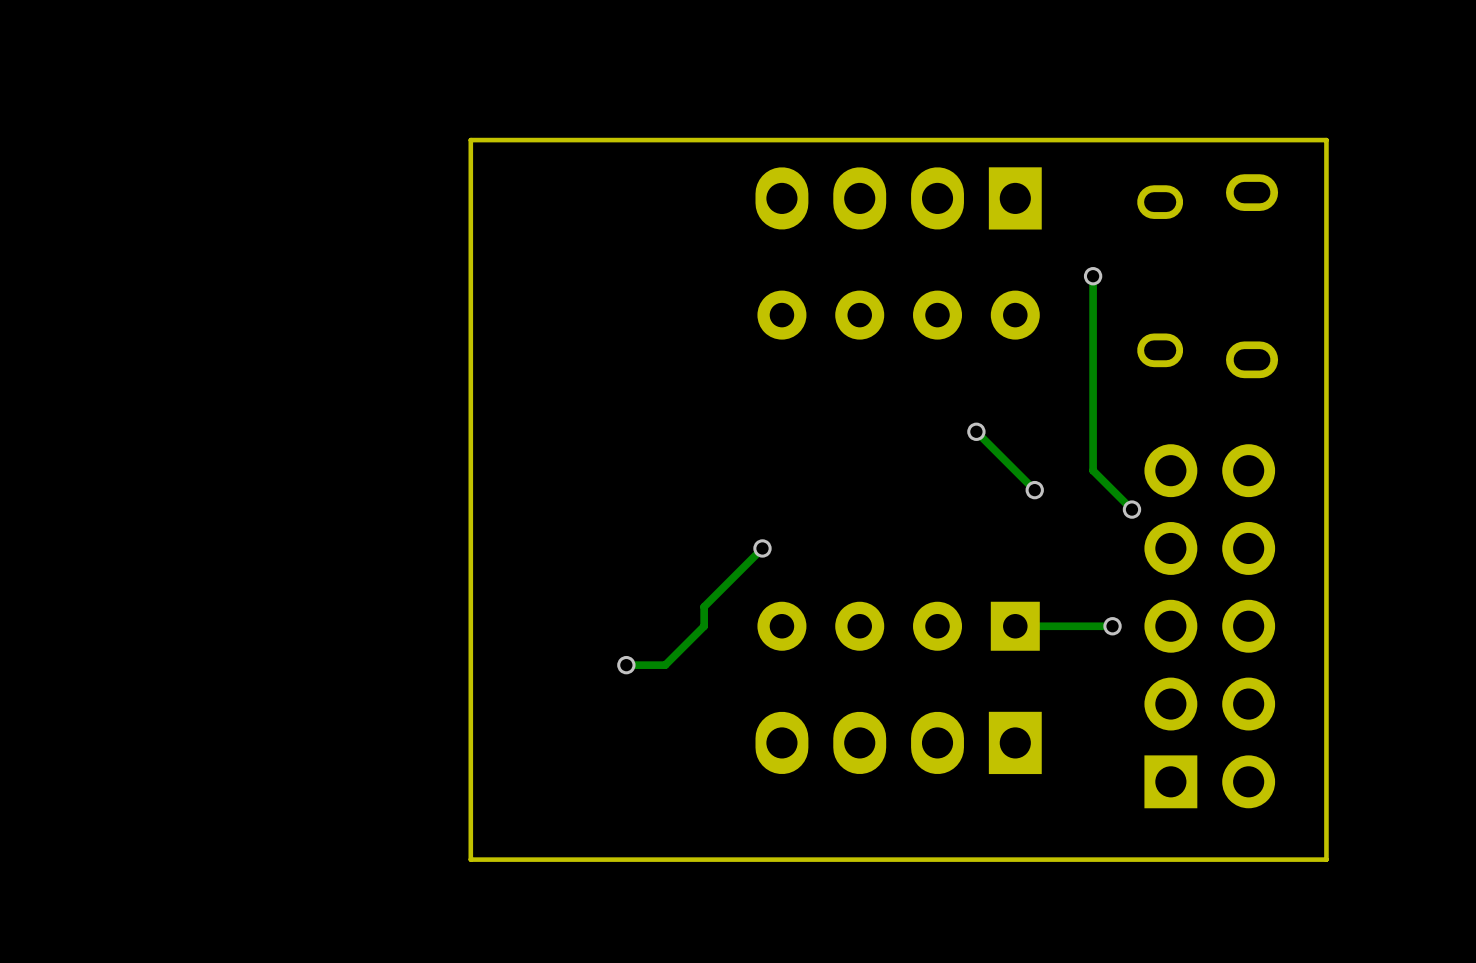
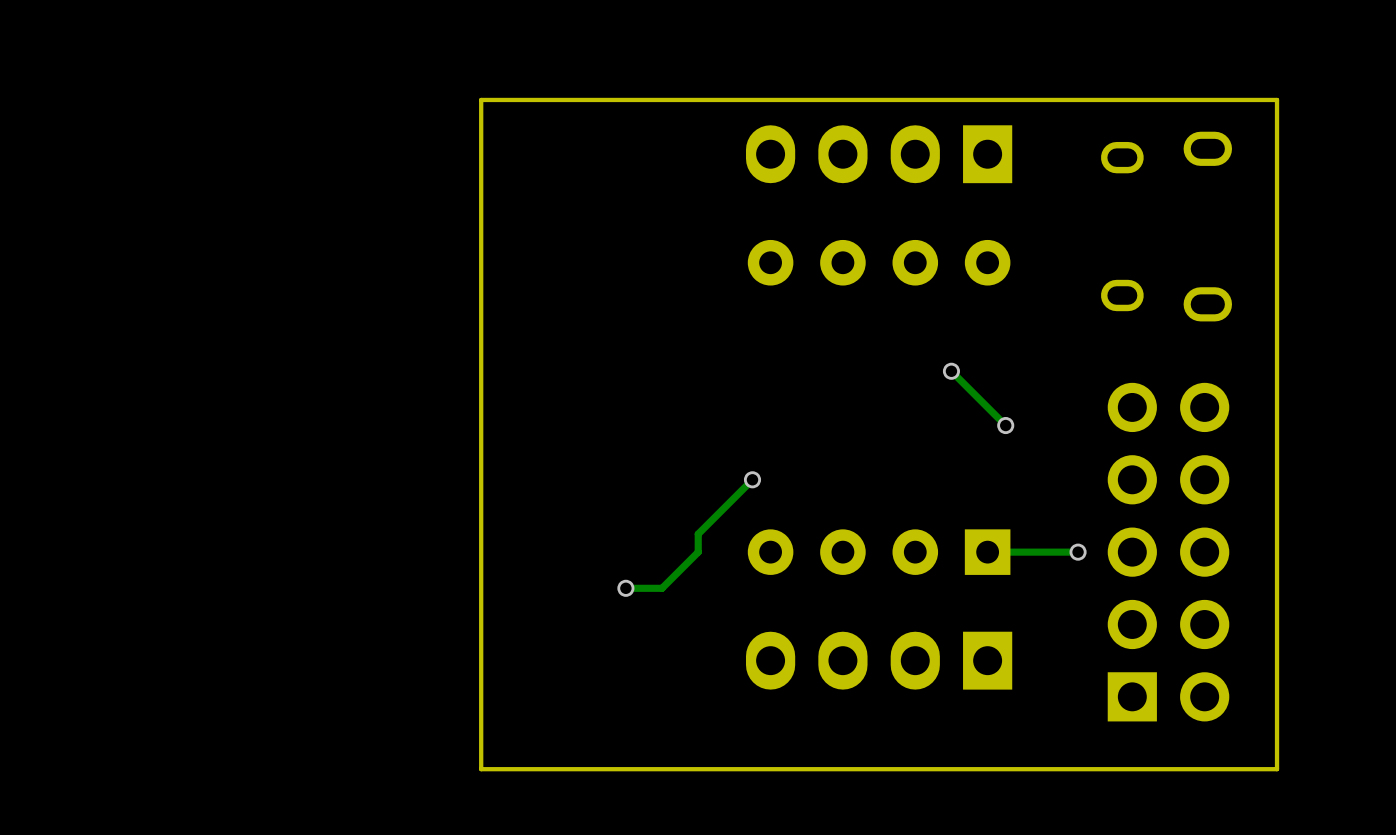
track: (1093, 276) (1093, 470) (1131, 509) -> none
via: (1093, 276) -> none
via: (1131, 509) -> none

